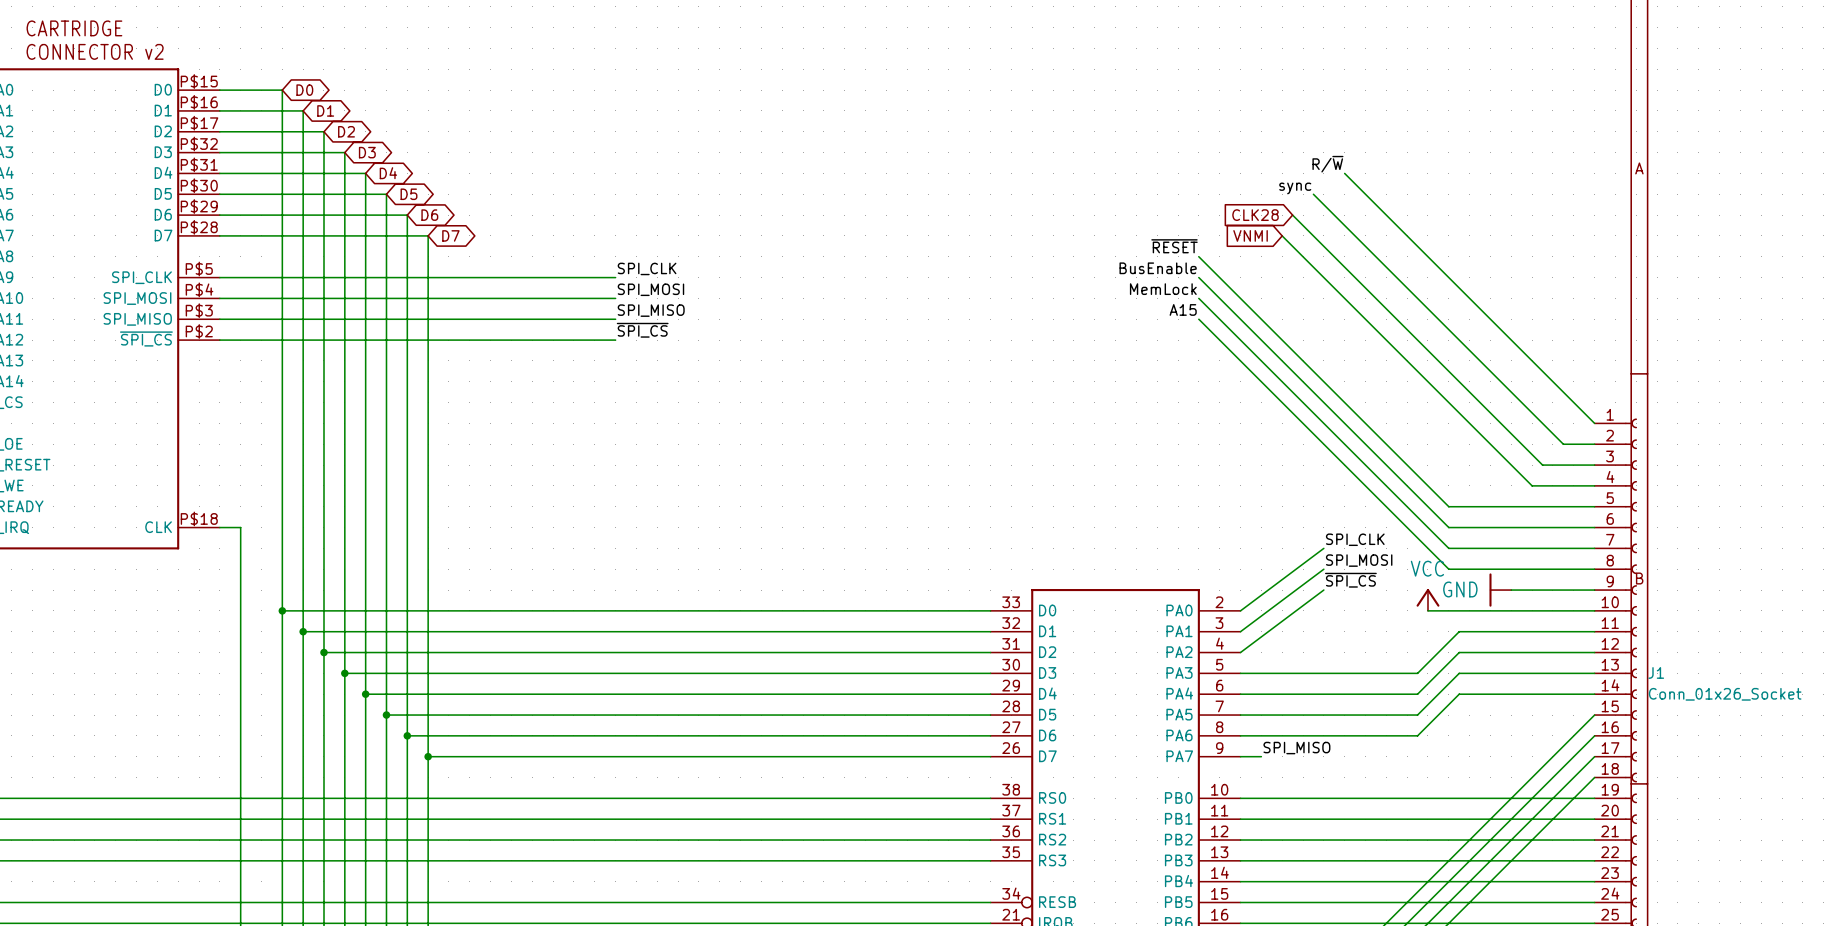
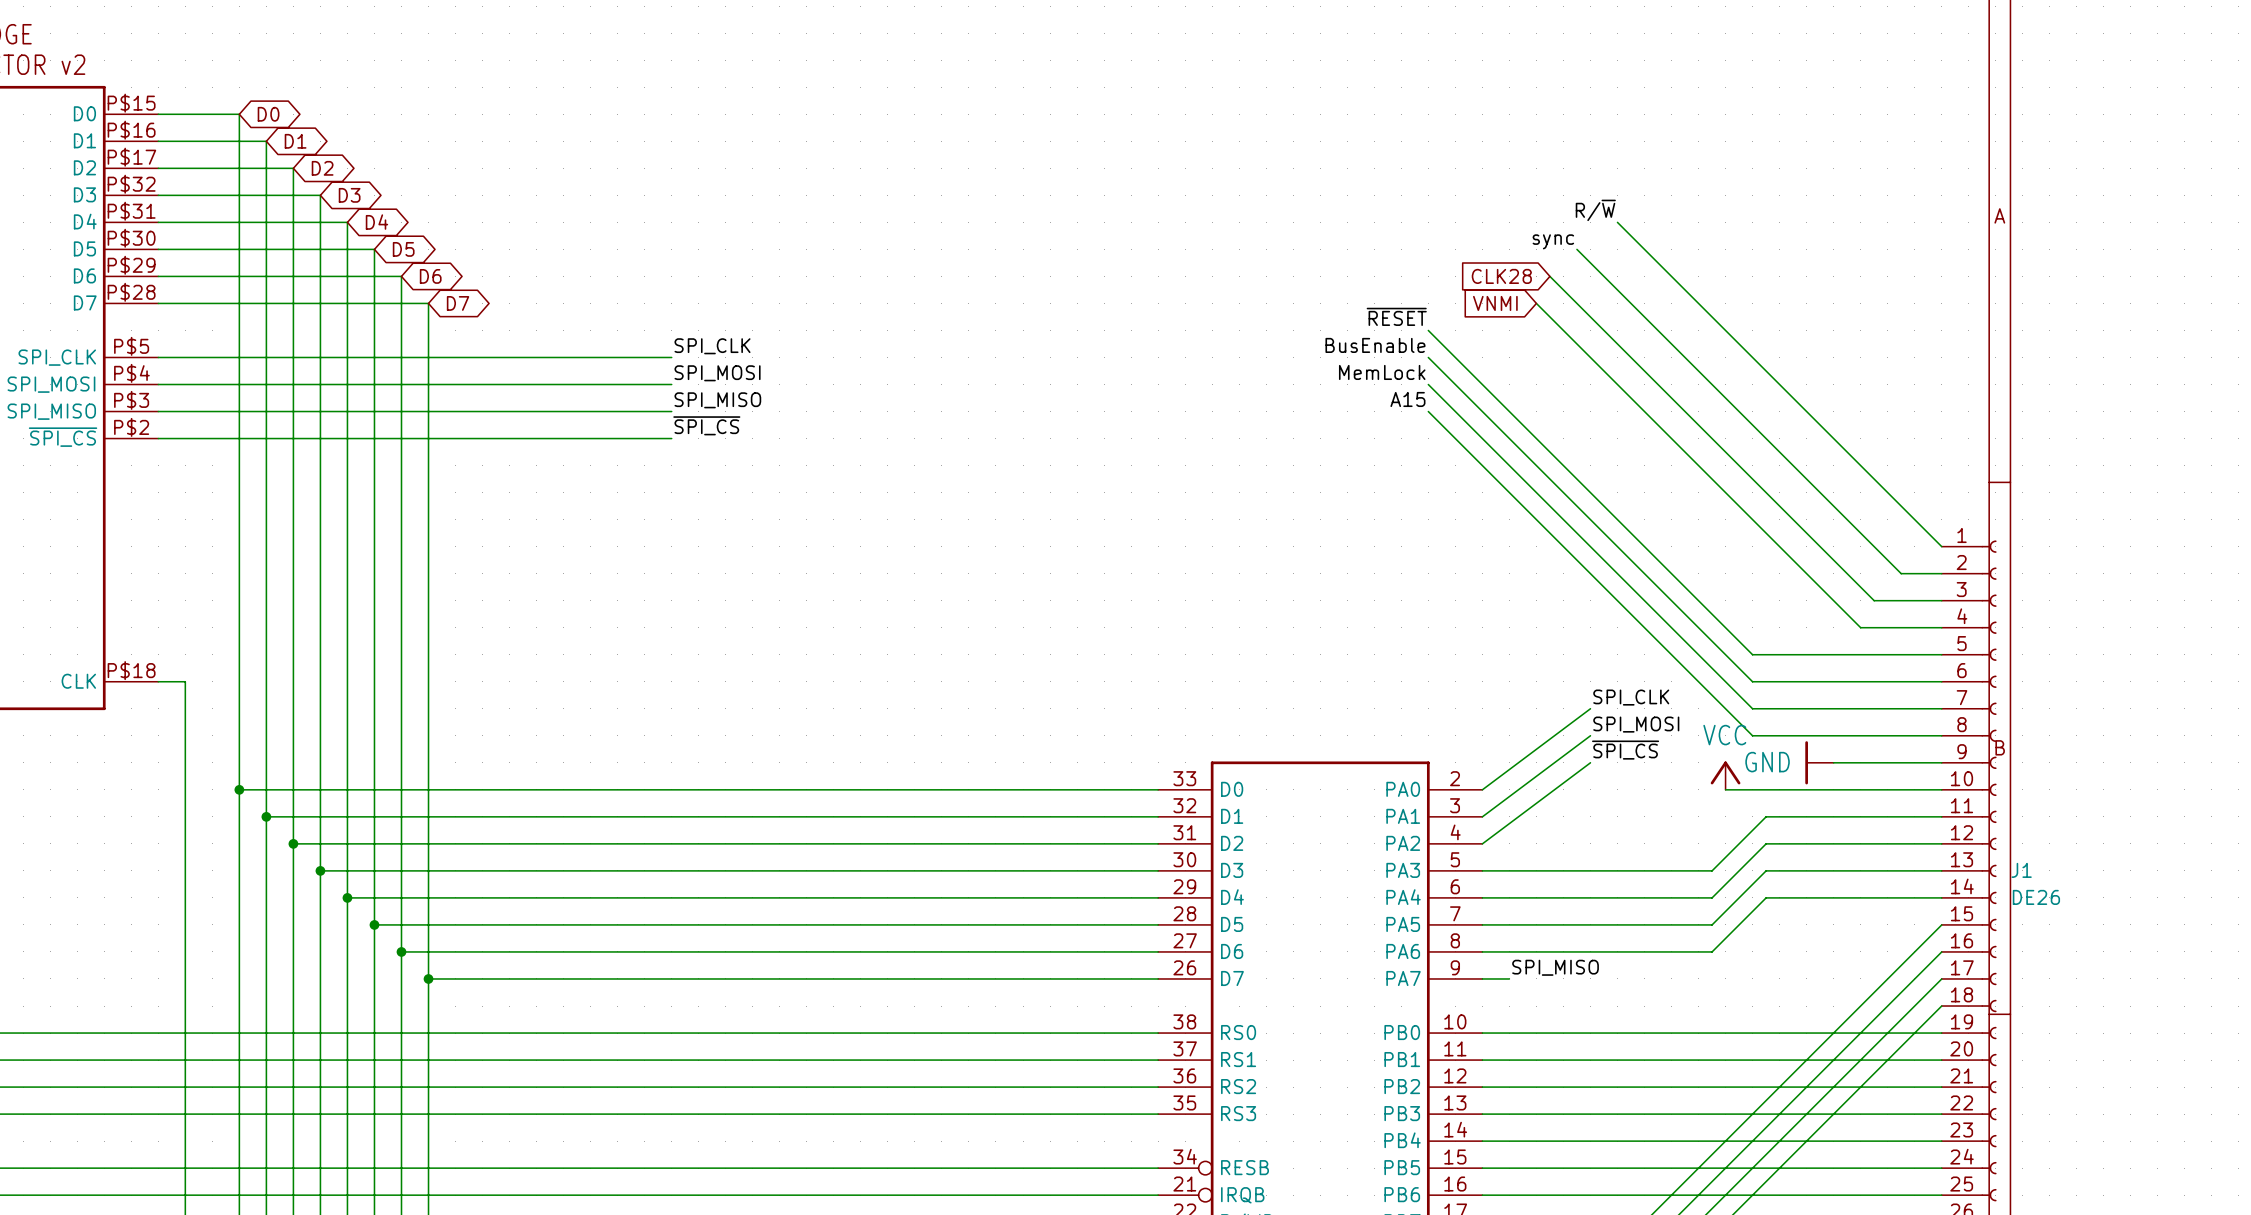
J1 value: Conn_01x26_Socket (1725, 694) -> DE26 (2036, 897)

